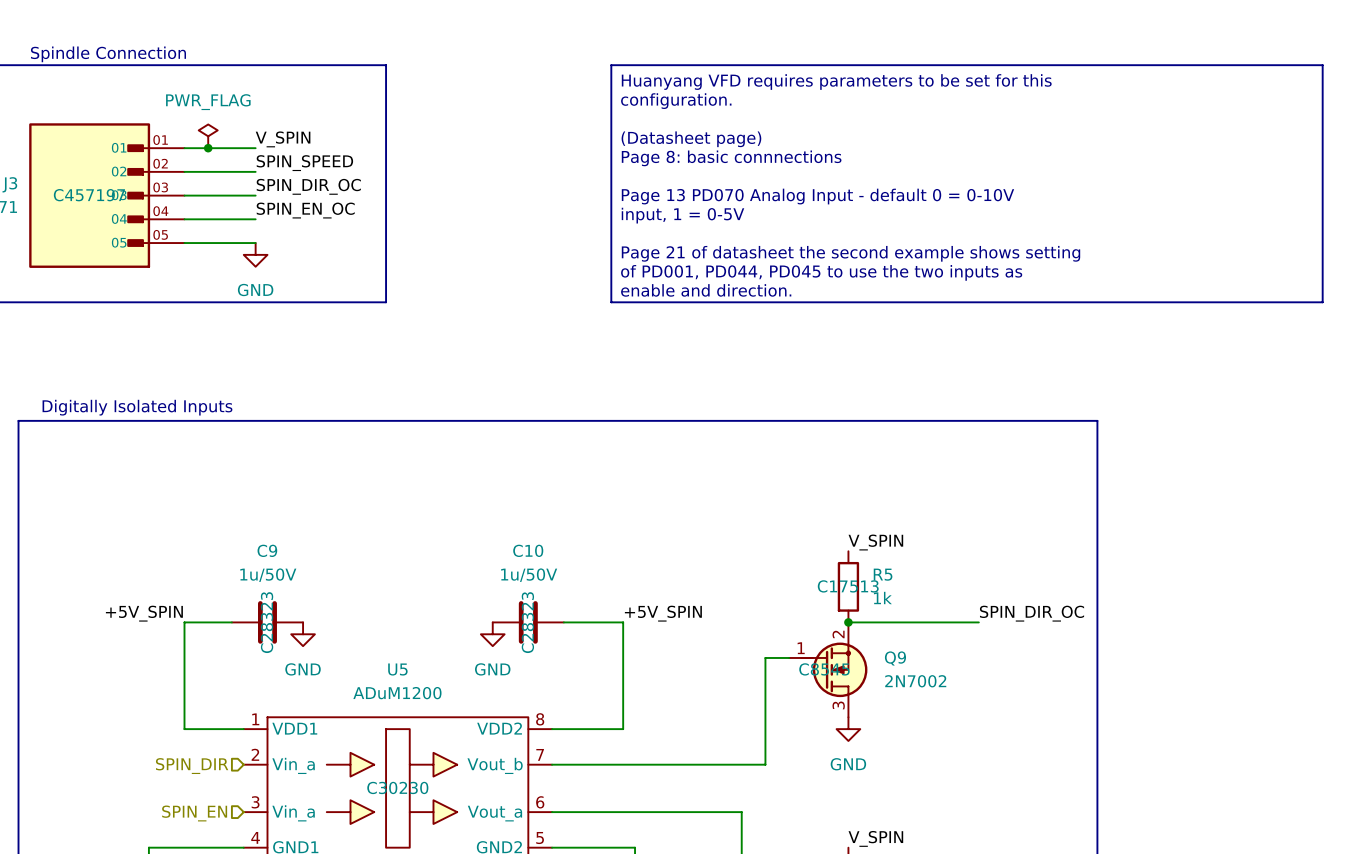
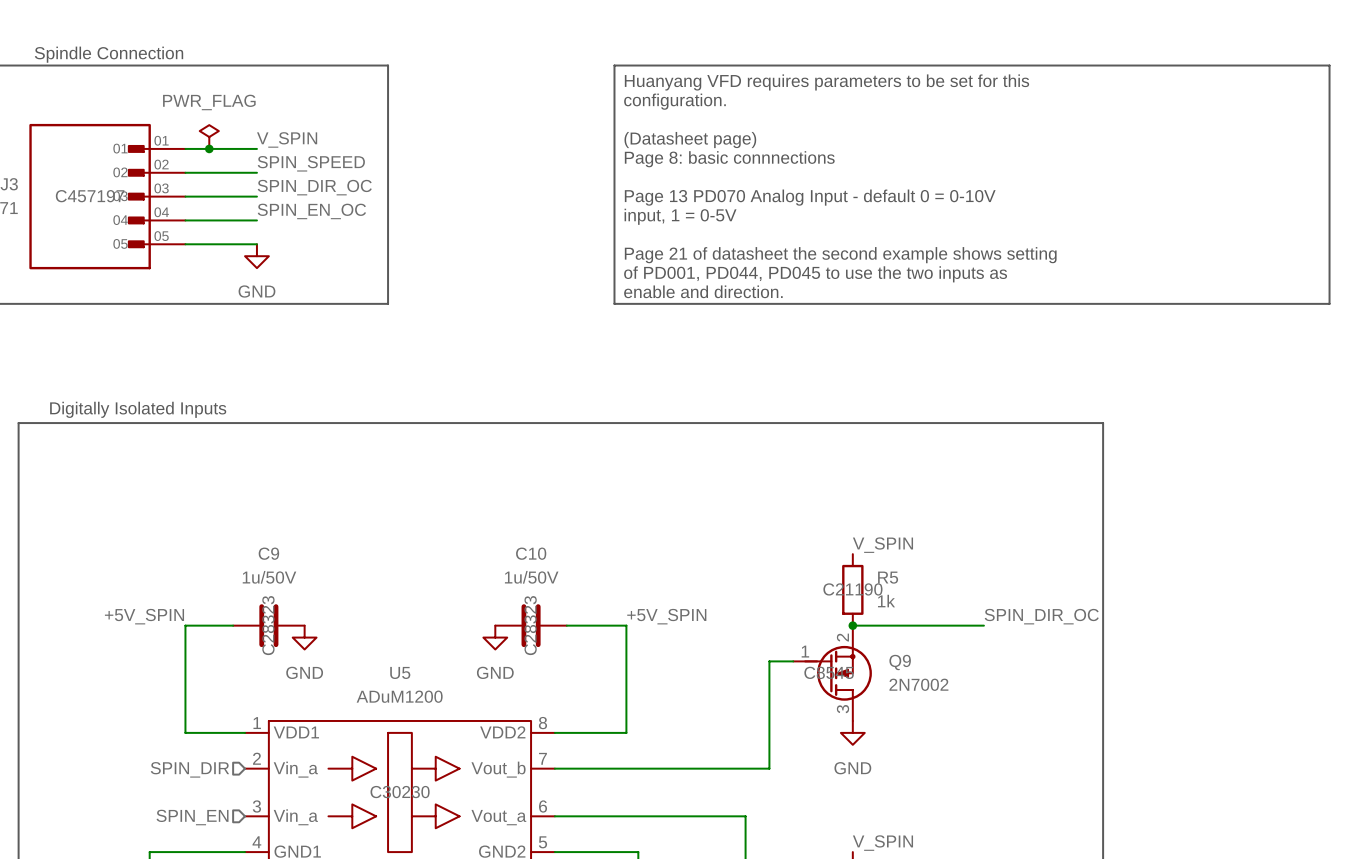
R5 text: C17513 (848, 586) -> C21190 (852, 589)

